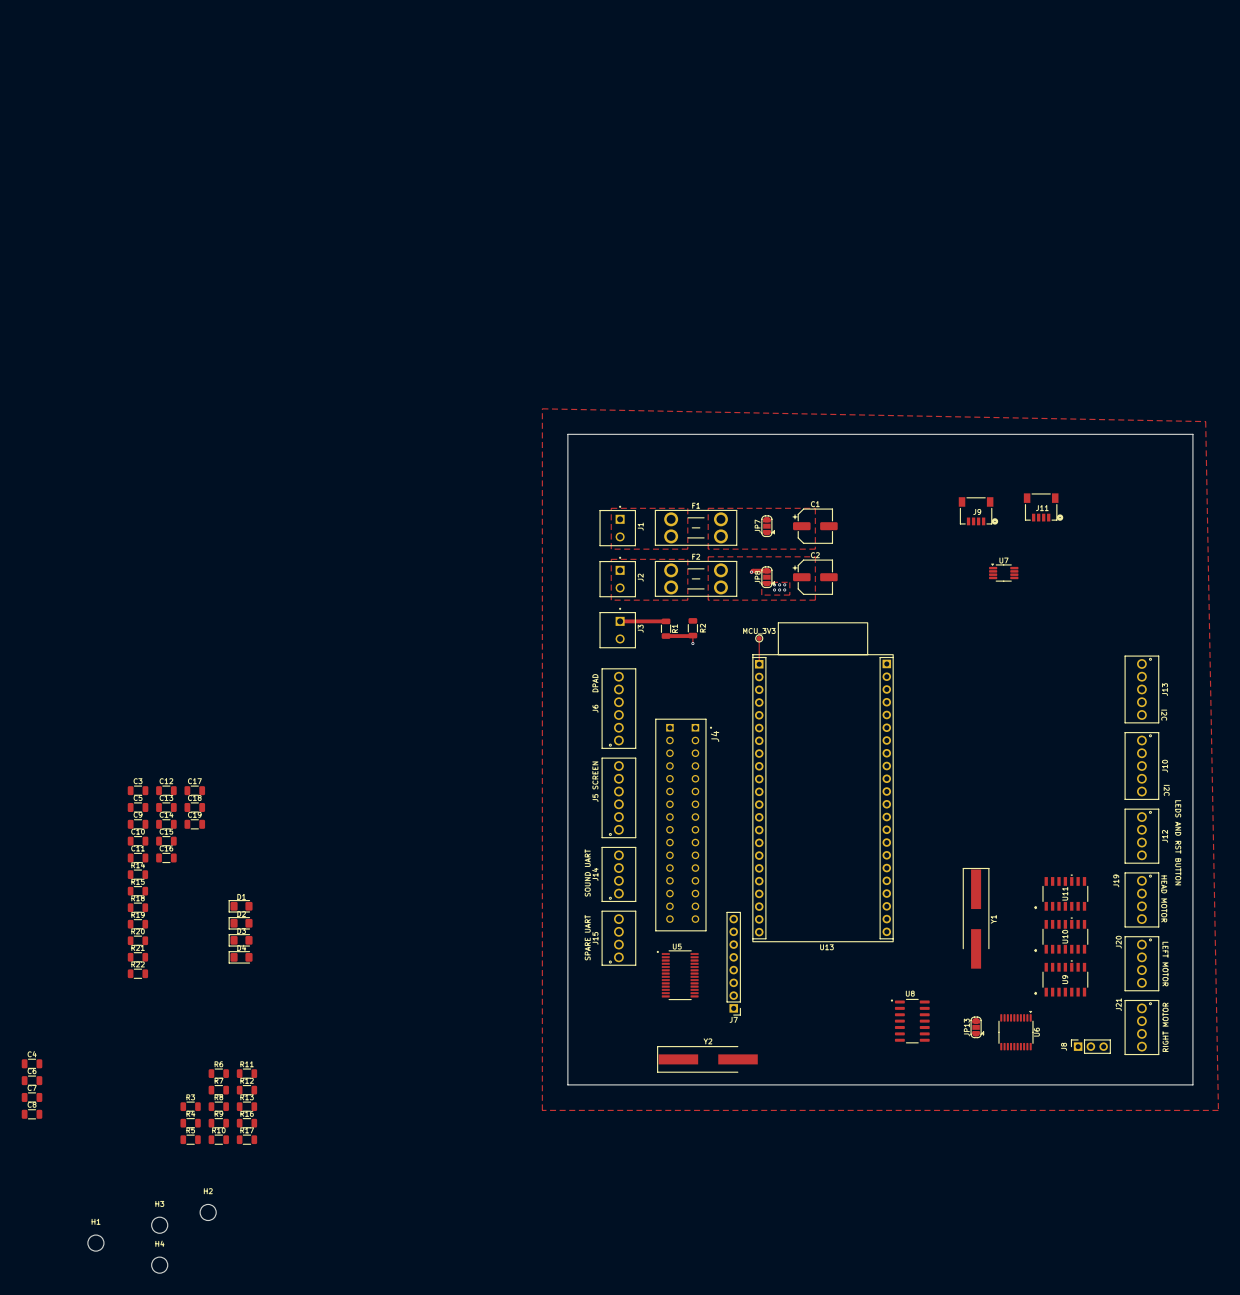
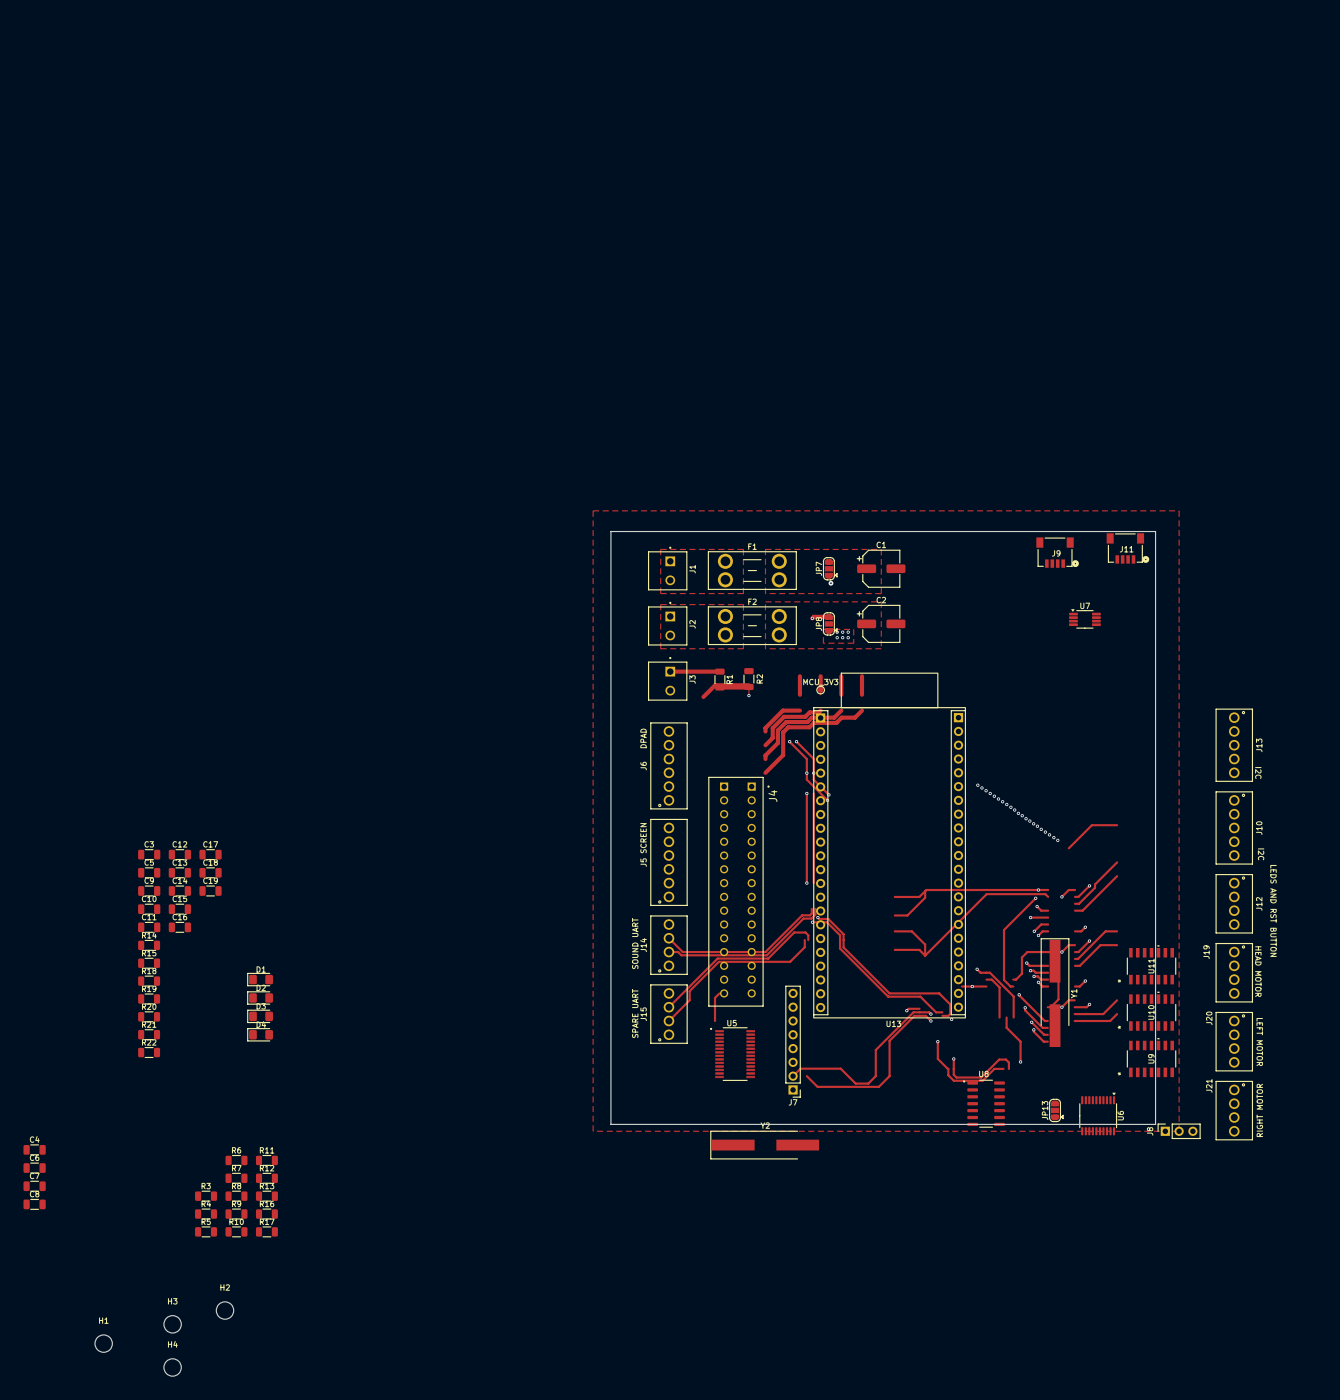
zone outline: (542, 408) (1205, 421) (1218, 1110) (542, 1110) (542, 408) -> (593, 510) (593, 1131) (1179, 1131) (1179, 510) (593, 510)
board edge: (567, 434) (1192, 434) (1192, 1084) (567, 1084) (567, 434) -> (610, 531) (610, 1124) (1155, 1124) (1155, 531) (610, 531)
via: none -> (830, 583)
track: none -> (799, 676) (799, 694)
track: none -> (820, 676) (820, 690)
track: none -> (841, 676) (841, 694)
track: none -> (862, 676) (862, 694)
track: none -> (748, 685) (715, 685) (703, 696)
track: (759, 642) (759, 664) -> none
track: none -> (799, 710) (782, 710) (765, 728) (765, 731)
track: none -> (820, 710) (809, 712) (805, 716) (784, 716) (772, 728) (772, 737) (765, 745)
track: none -> (841, 710) (834, 717) (811, 717) (807, 722) (786, 722) (777, 730) (777, 743) (765, 755) (765, 759)
track: none -> (862, 710) (854, 717) (841, 717) (836, 722) (813, 722) (809, 727) (788, 727) (783, 732) (783, 755) (765, 772)
track: none -> (789, 741) (806, 759) (806, 779) (827, 800)
via: none -> (789, 741)
track: none -> (796, 741) (813, 758) (813, 779) (828, 794)
via: none -> (796, 741)
via: none -> (806, 773)
via: none -> (813, 773)
via: none -> (977, 785)
via: none -> (981, 787)
via: none -> (986, 790)
track: none -> (806, 793) (806, 883)
via: none -> (806, 793)
track: none -> (813, 793) (813, 883)
via: none -> (990, 793)
via: none -> (828, 794)
via: none -> (994, 796)
via: none -> (998, 799)
via: none -> (827, 800)
via: none -> (1002, 801)
via: none -> (1006, 804)
via: none -> (1010, 807)
via: none -> (1014, 810)
via: none -> (1018, 813)
via: none -> (1022, 815)
via: none -> (1026, 818)
via: none -> (1029, 821)
via: none -> (1033, 823)
track: none -> (1117, 825) (1091, 825) (1068, 848)
via: none -> (1037, 826)
via: none -> (1041, 829)
via: none -> (1045, 832)
via: none -> (1049, 834)
via: none -> (1053, 837)
via: none -> (1057, 840)
track: none -> (1117, 862) (1079, 903) (1075, 903)
track: none -> (1117, 876) (1082, 910) (1075, 910)
via: none -> (806, 883)
track: none -> (1089, 885) (1078, 896) (1075, 896)
via: none -> (1089, 885)
via: none -> (1038, 890)
track: none -> (1048, 890) (926, 890) (919, 896) (894, 896)
track: none -> (1075, 890) (1068, 890) (1061, 896)
track: none -> (925, 891) (925, 897) (907, 915) (894, 915)
track: none -> (1048, 896) (1045, 894) (986, 894) (925, 955)
via: none -> (1061, 896)
track: none -> (1035, 898) (1004, 929) (1004, 979) (1010, 986) (1013, 986)
via: none -> (1035, 898)
track: none -> (1037, 906) (1041, 910) (1048, 910)
via: none -> (1037, 906)
track: none -> (811, 908) (810, 915) (802, 915) (765, 952) (682, 952) (668, 938)
track: none -> (815, 908) (815, 914) (811, 918) (803, 918) (766, 955) (681, 955) (678, 952) (668, 952)
track: none -> (817, 917) (828, 918) (843, 934) (843, 947) (889, 993) (939, 993) (950, 1004) (950, 1014) (942, 1015)
via: none -> (817, 917)
track: none -> (1030, 917) (1048, 917)
via: none -> (1030, 917)
track: none -> (812, 922) (826, 922) (840, 935) (840, 948) (888, 996) (920, 996) (936, 1012) (942, 1012)
via: none -> (812, 922)
track: none -> (1048, 924) (1041, 924) (1034, 931)
track: none -> (1085, 927) (1081, 931) (1075, 931)
via: none -> (1085, 927)
track: none -> (894, 931) (911, 931) (925, 944) (925, 955)
via: none -> (1034, 931)
track: none -> (1048, 931) (1042, 931) (1038, 935)
track: none -> (1117, 931) (1105, 931) (1077, 958) (1075, 958)
via: none -> (1038, 935)
track: none -> (804, 940) (804, 947) (790, 961) (718, 961) (689, 991) (689, 1000) (668, 1020)
track: none -> (808, 940) (808, 935) (805, 932) (794, 932) (768, 958) (717, 958) (668, 1007)
track: none -> (1089, 941) (1078, 952) (1075, 952)
via: none -> (1089, 941)
track: none -> (1075, 945) (1068, 945) (1061, 952)
track: none -> (1117, 945) (1100, 945) (1079, 965) (1075, 965)
track: none -> (894, 949) (919, 949) (925, 955)
via: none -> (1061, 952)
track: none -> (1026, 963) (1029, 965) (1048, 965)
via: none -> (1026, 963)
track: none -> (977, 969) (980, 972) (989, 972) (1013, 996) (1013, 1017)
via: none -> (977, 969)
track: none -> (1030, 970) (1048, 972)
via: none -> (1030, 970)
track: none -> (1034, 976) (1037, 976) (1041, 979) (1048, 979)
via: none -> (1034, 976)
track: none -> (986, 979) (991, 979) (999, 987) (999, 1017)
track: none -> (1013, 979) (1016, 979) (1021, 973) (1021, 957) (1027, 952) (1052, 952) (1058, 958) (1058, 999) (1050, 1007) (1047, 1007)
track: none -> (1085, 981) (1079, 986) (1075, 986)
via: none -> (1085, 981)
track: none -> (1038, 982) (1042, 986) (1048, 986)
via: none -> (1038, 982)
track: none -> (961, 986) (986, 986)
via: none -> (972, 986)
track: none -> (719, 993) (715, 997) (715, 1020)
track: none -> (1019, 994) (1044, 1020) (1047, 1020)
via: none -> (1019, 994)
track: none -> (1074, 1000) (1068, 1000) (1061, 1007)
track: none -> (1117, 1000) (1103, 1014) (1074, 1014)
track: none -> (1089, 1004) (1086, 1007) (1074, 1007)
via: none -> (1089, 1004)
via: none -> (1061, 1007)
track: none -> (1025, 1007) (1025, 1010) (1042, 1027) (1047, 1027)
via: none -> (1025, 1007)
track: none -> (919, 1008) (908, 1008) (906, 1010)
via: none -> (906, 1010)
track: none -> (930, 1014) (929, 1012) (913, 1012) (875, 1050) (875, 1076) (868, 1083) (855, 1083) (840, 1068) (800, 1068) (793, 1076)
via: none -> (930, 1014)
track: none -> (1117, 1014) (1110, 1020) (1074, 1020)
track: none -> (1006, 1017) (1006, 1027) (1020, 1041) (1020, 1061)
via: none -> (951, 1019)
track: none -> (930, 1020) (925, 1015) (914, 1015) (889, 1040) (889, 1076) (878, 1086) (817, 1086) (806, 1076)
via: none -> (930, 1020)
track: none -> (1031, 1022) (1044, 1034) (1047, 1034)
via: none -> (1031, 1022)
track: none -> (1033, 1029) (1043, 1041) (1047, 1041)
via: none -> (1033, 1029)
track: none -> (937, 1041) (937, 1058) (948, 1068) (948, 1075) (953, 1080) (982, 1080) (994, 1068) (1003, 1068)
via: none -> (937, 1041)
track: none -> (953, 1058) (953, 1074) (956, 1077) (981, 1077) (999, 1059) (1005, 1059) (1008, 1062) (1008, 1068)
via: none -> (953, 1058)
via: none -> (1020, 1061)

